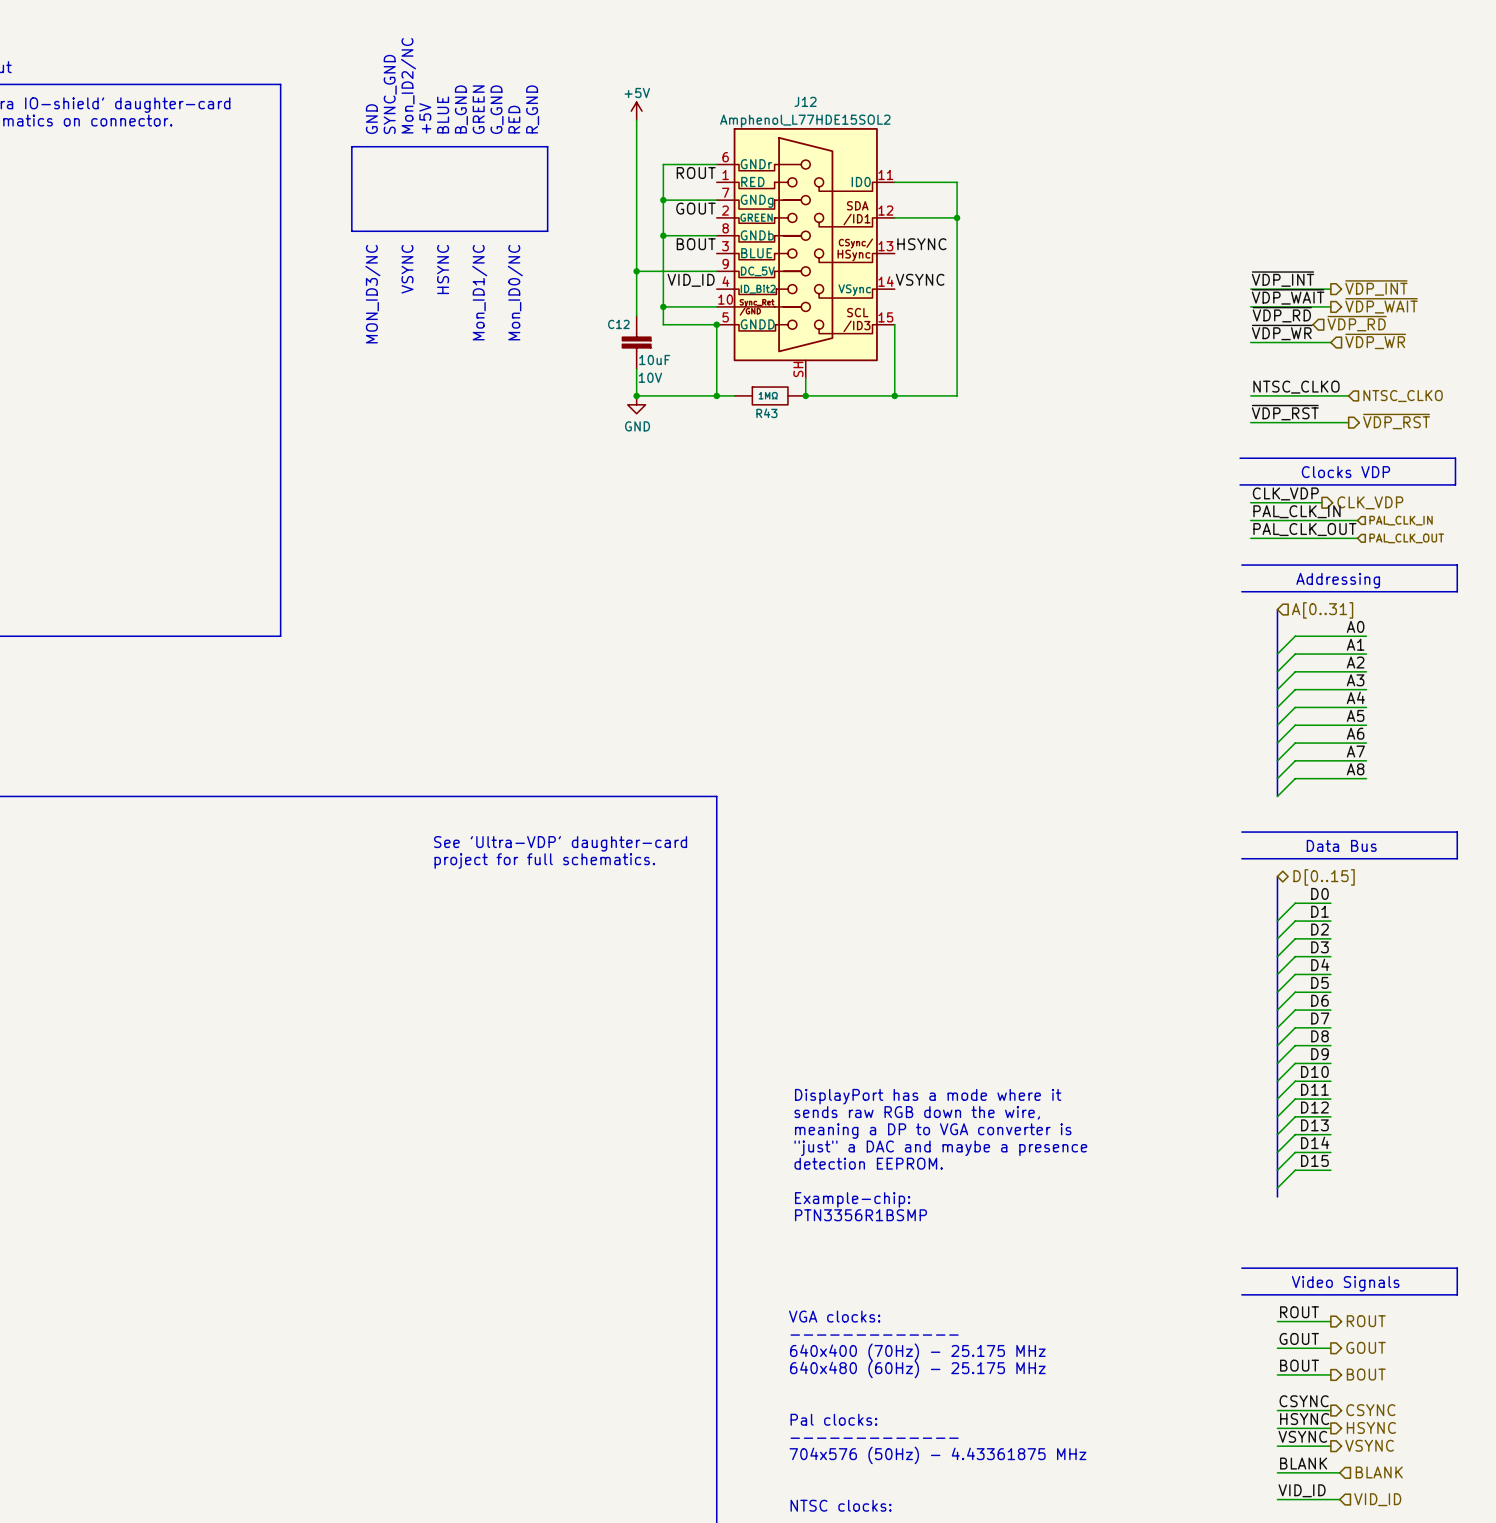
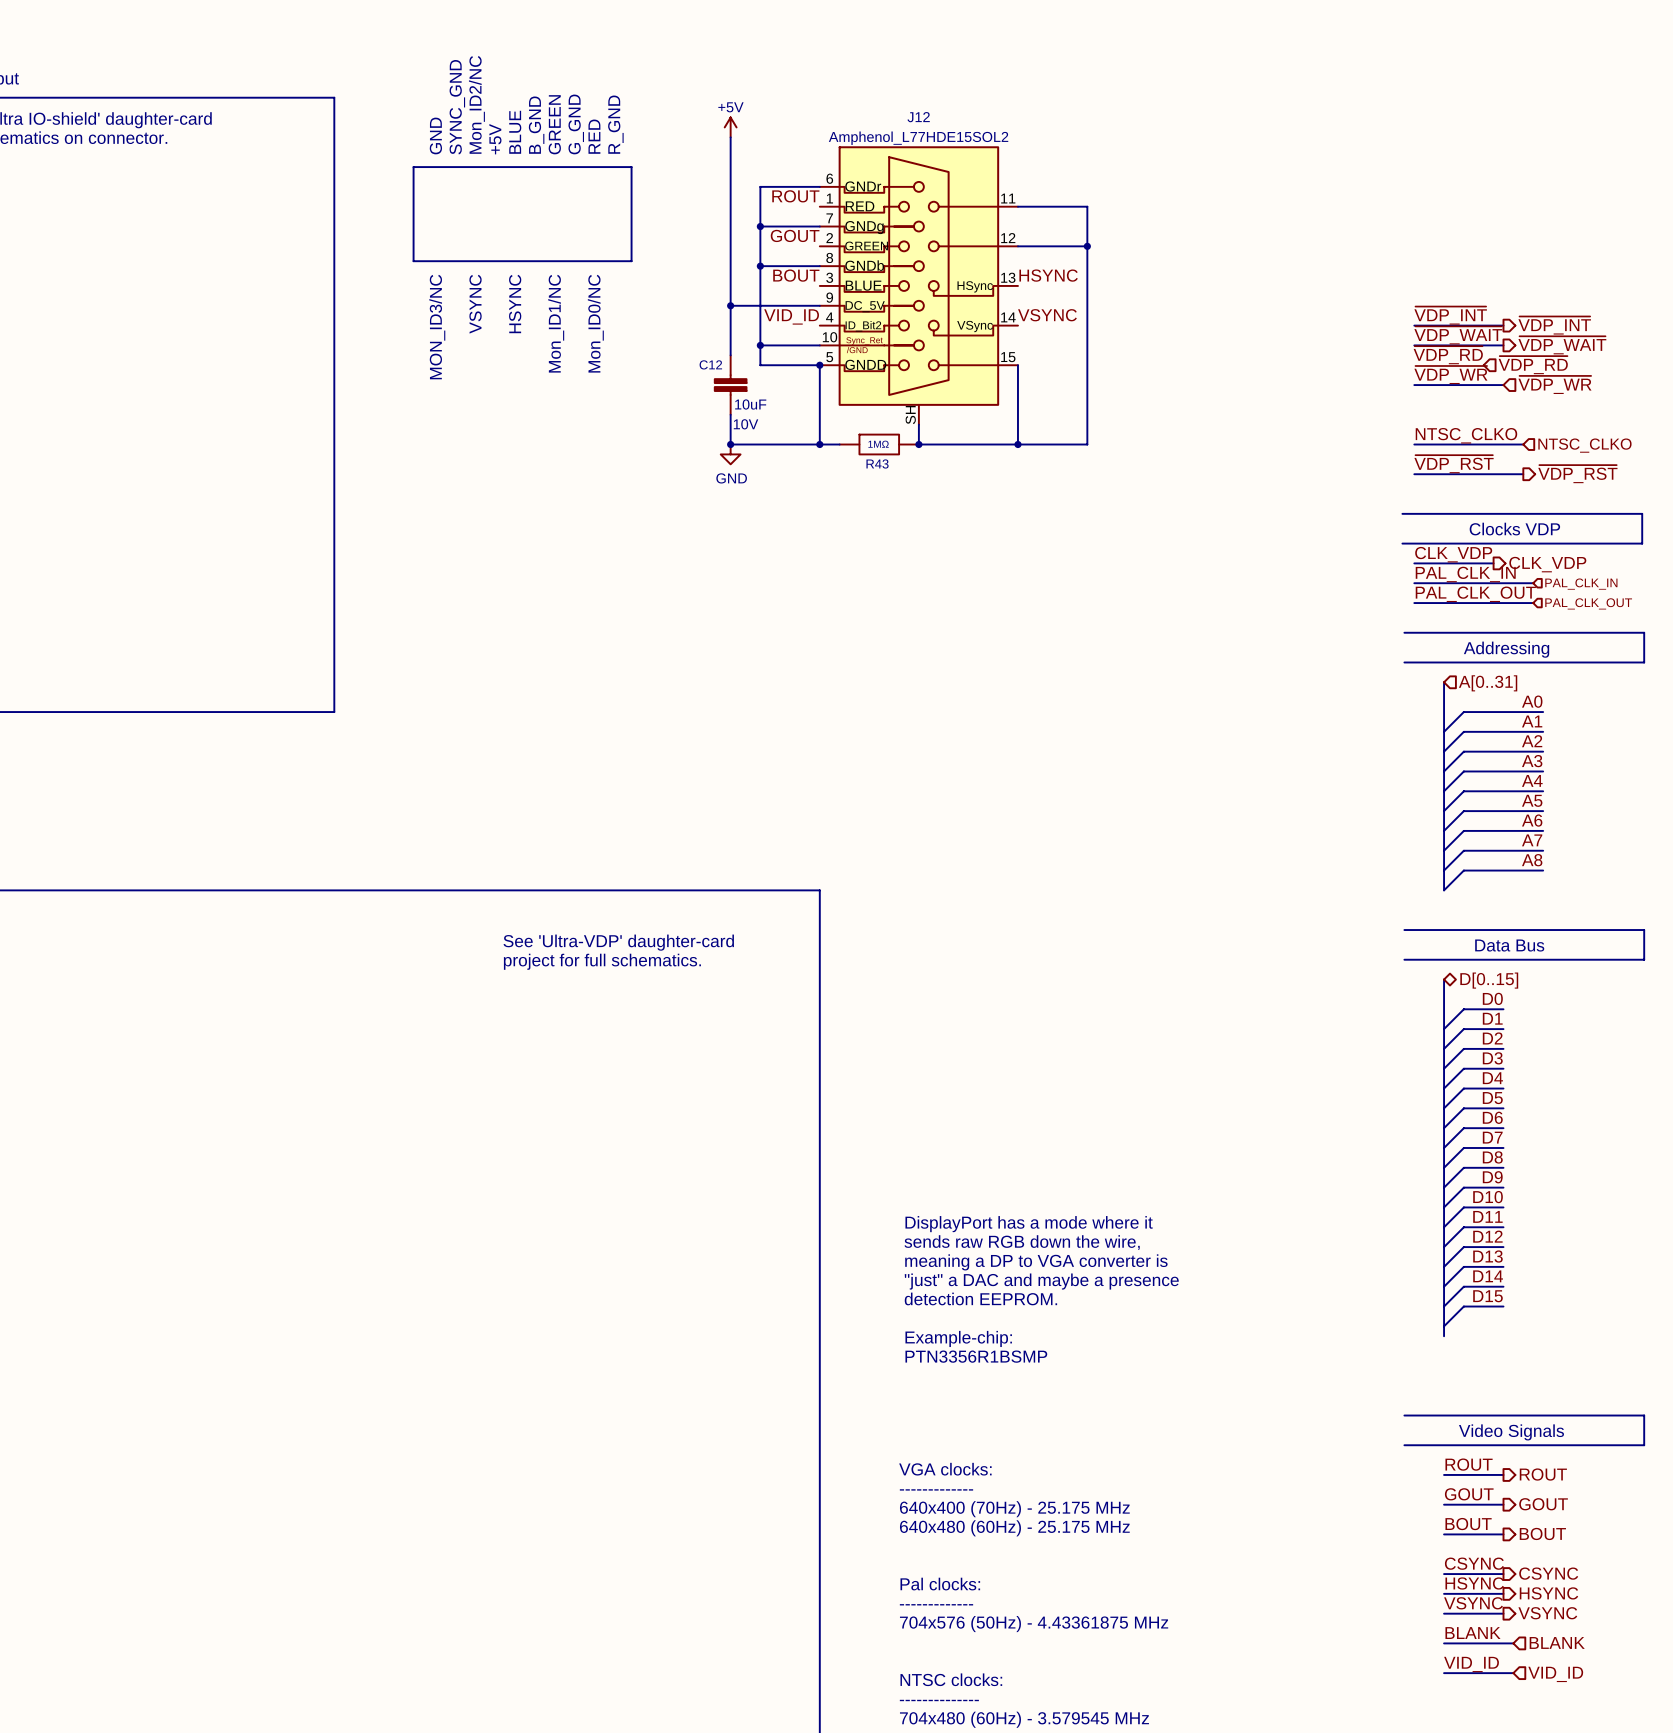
J12 symbol: [716, 128, 895, 379] -> [819, 146, 1018, 425]

